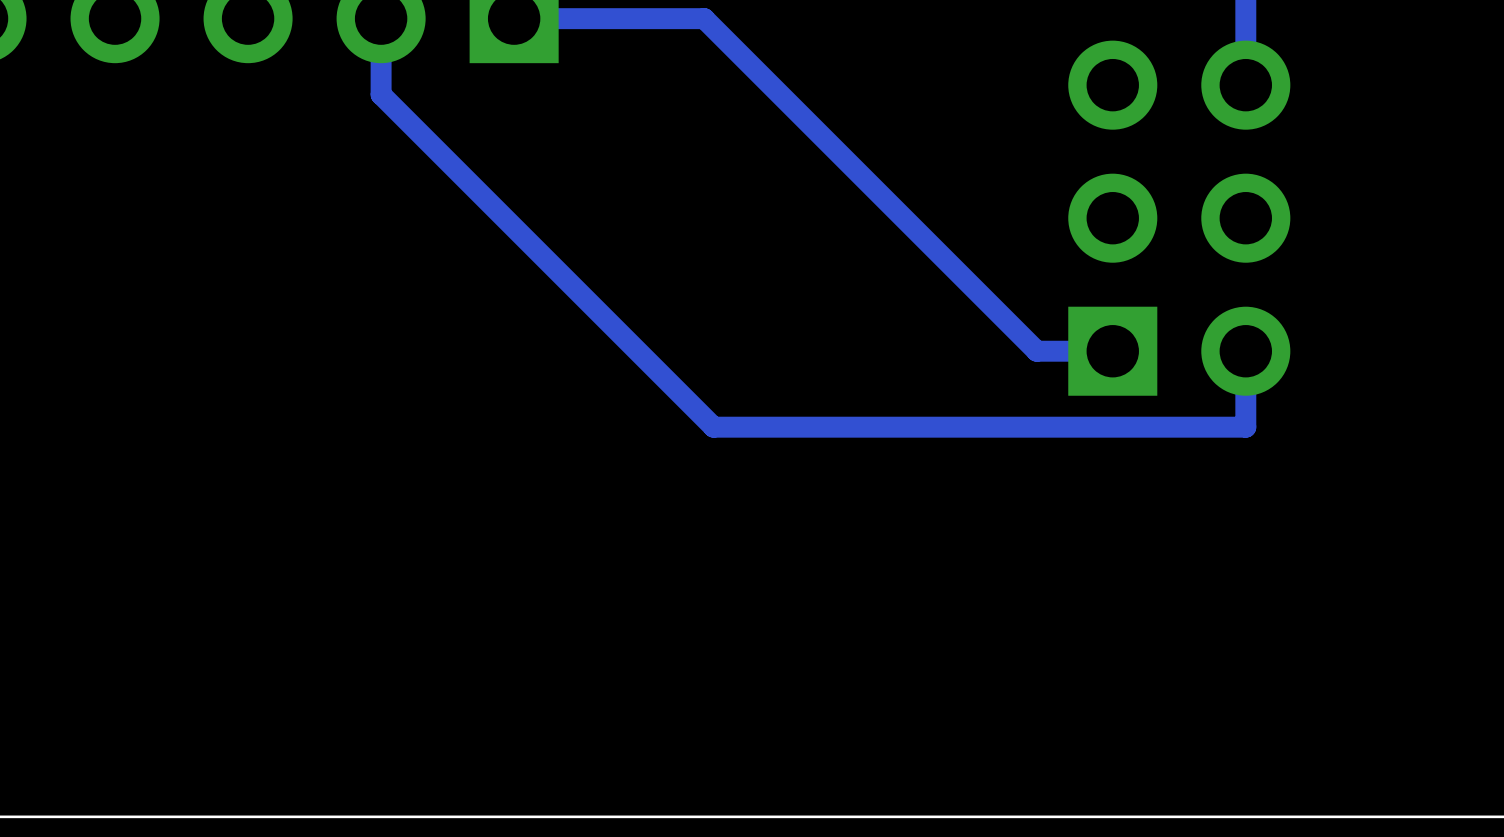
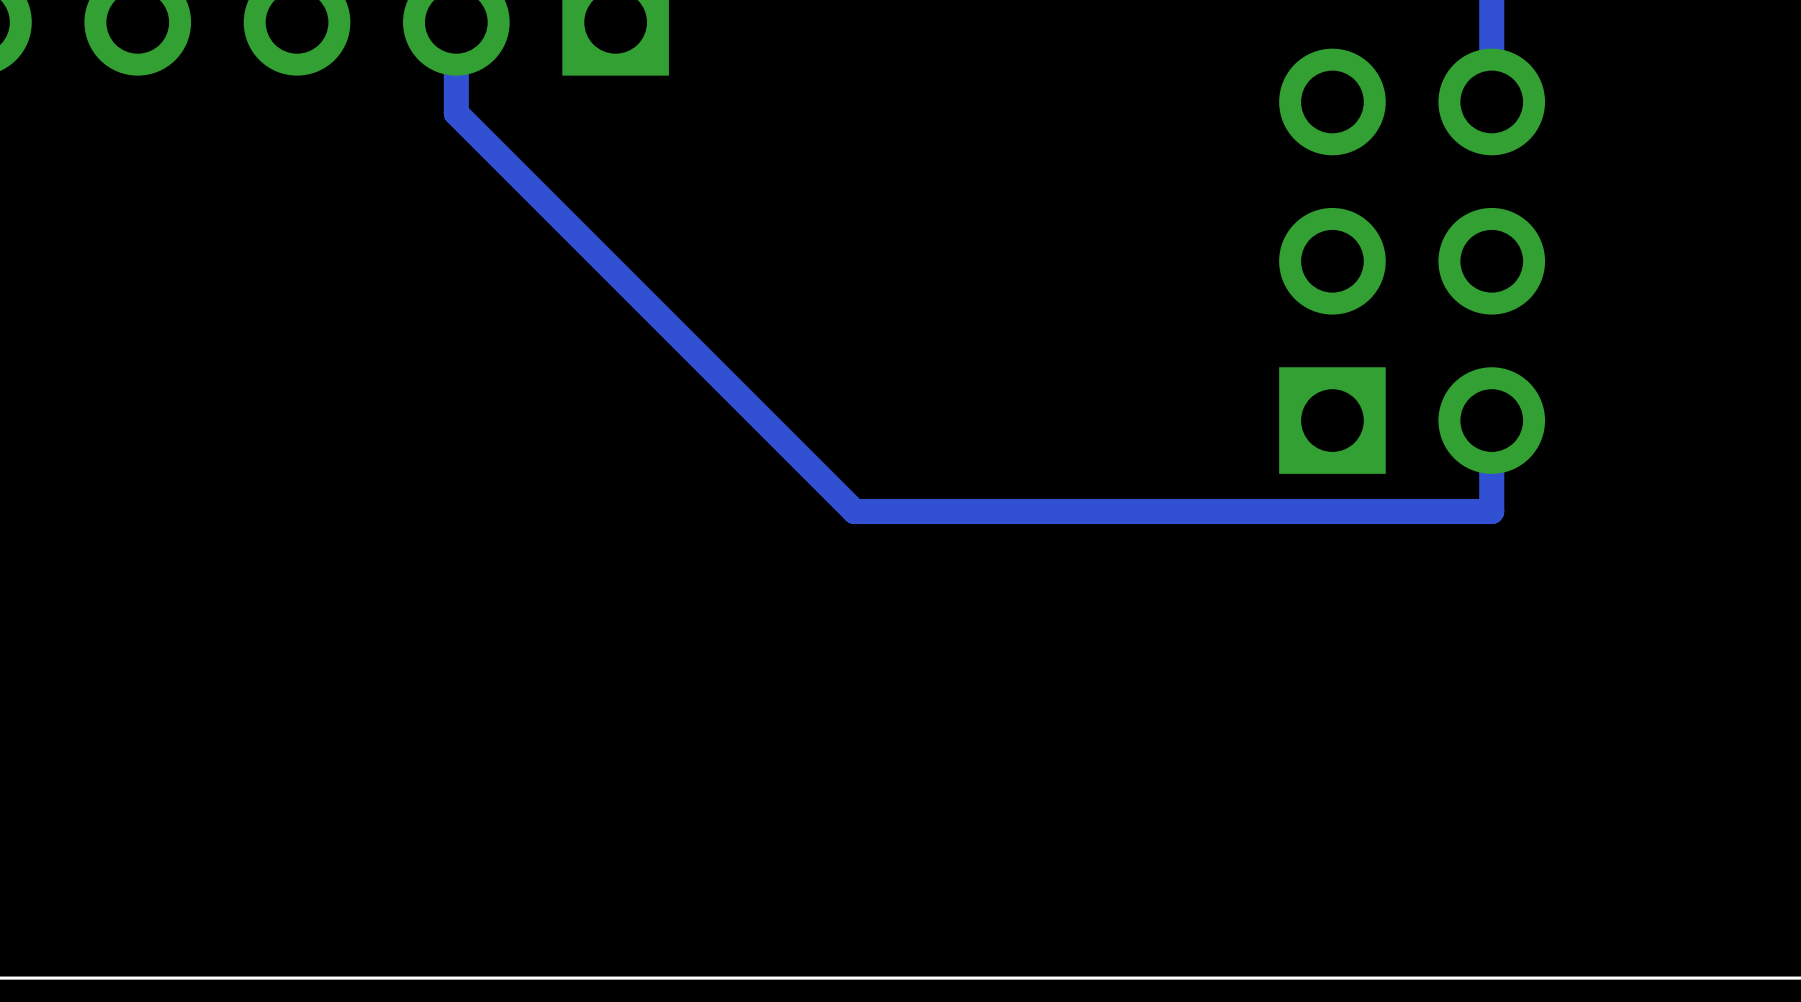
track: (514, 18) (704, 18) (1036, 351) (1112, 351) -> none

